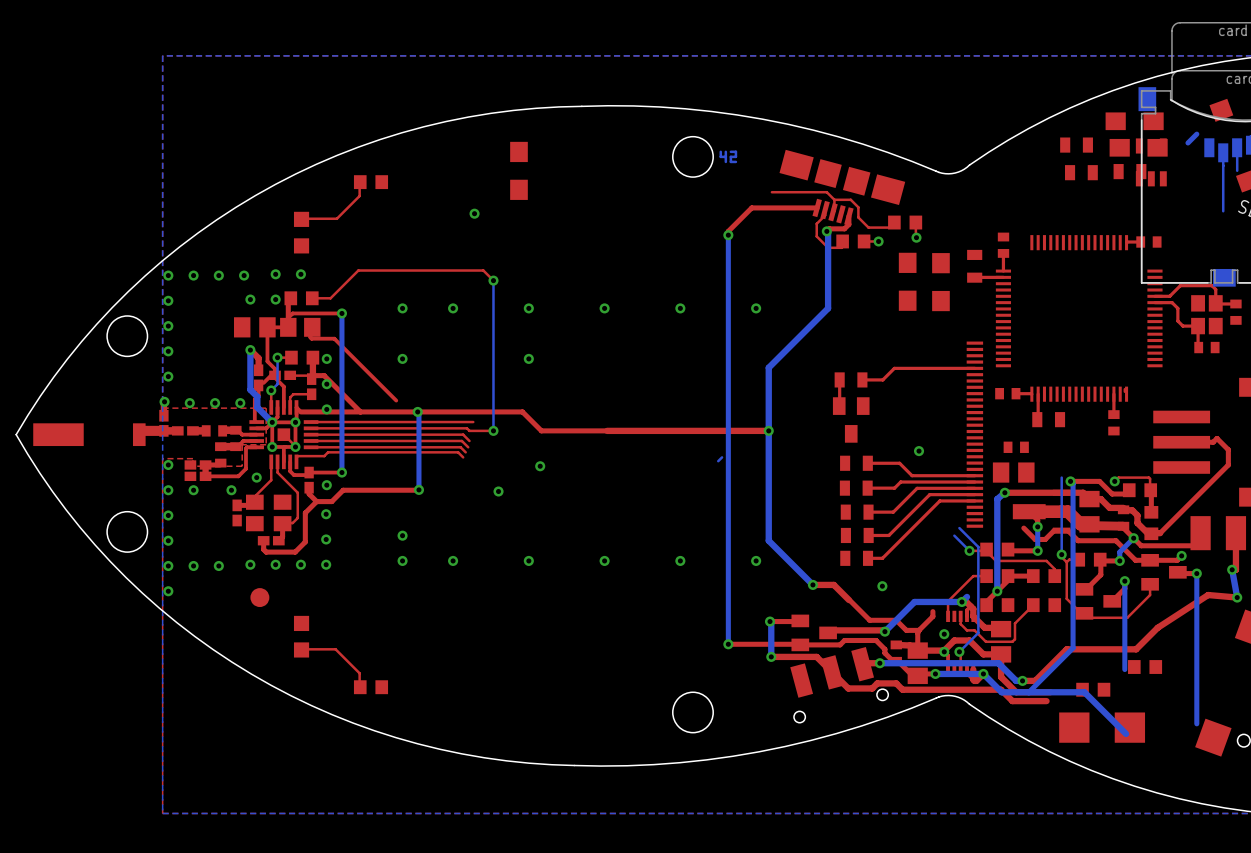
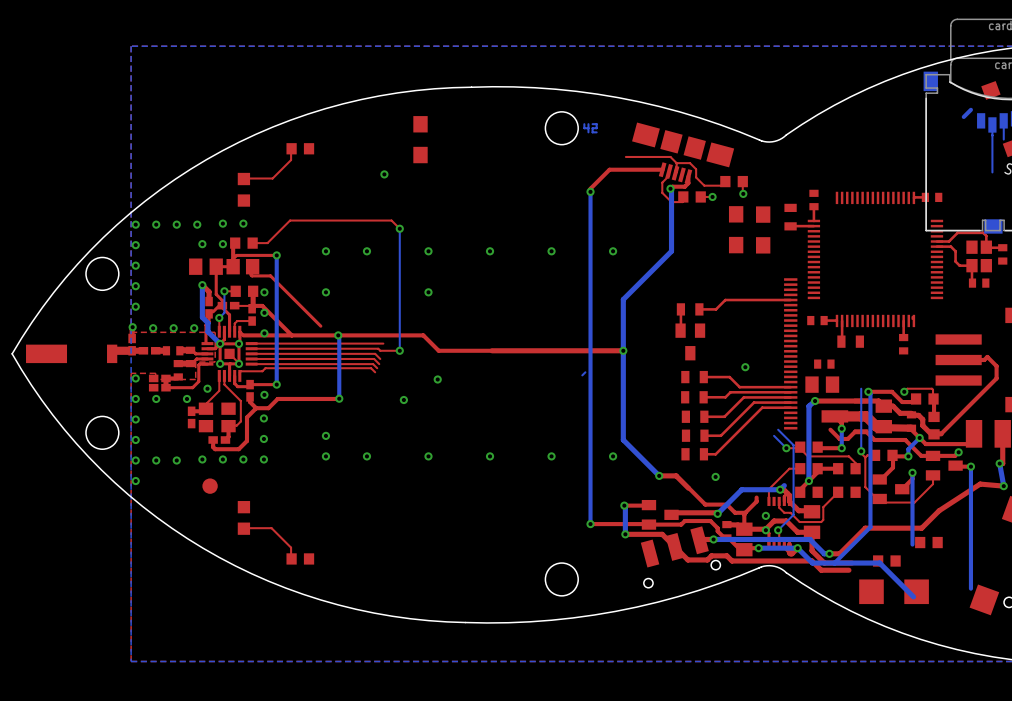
part: (1134, 121) -> none
part: (1076, 145) -> none
part: (1138, 147) -> none
part: (1151, 162) -> none
part: (1129, 171) -> none
part: (1081, 172) -> none

